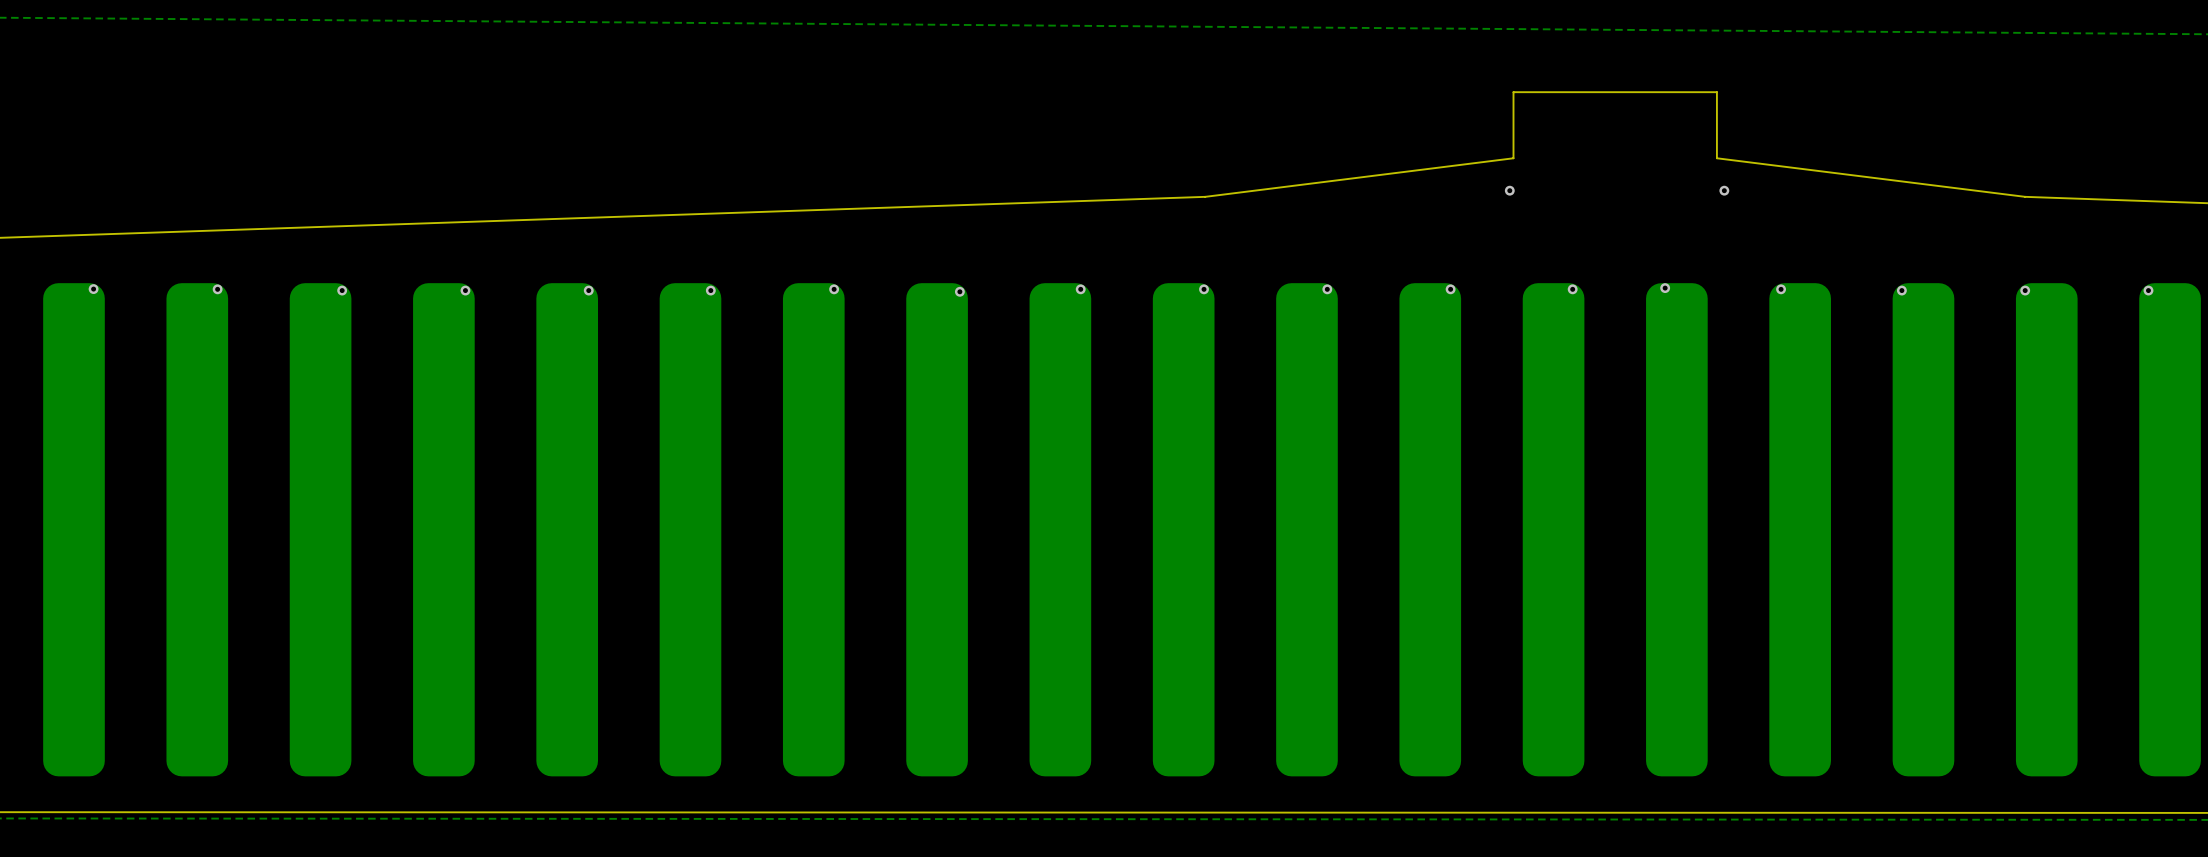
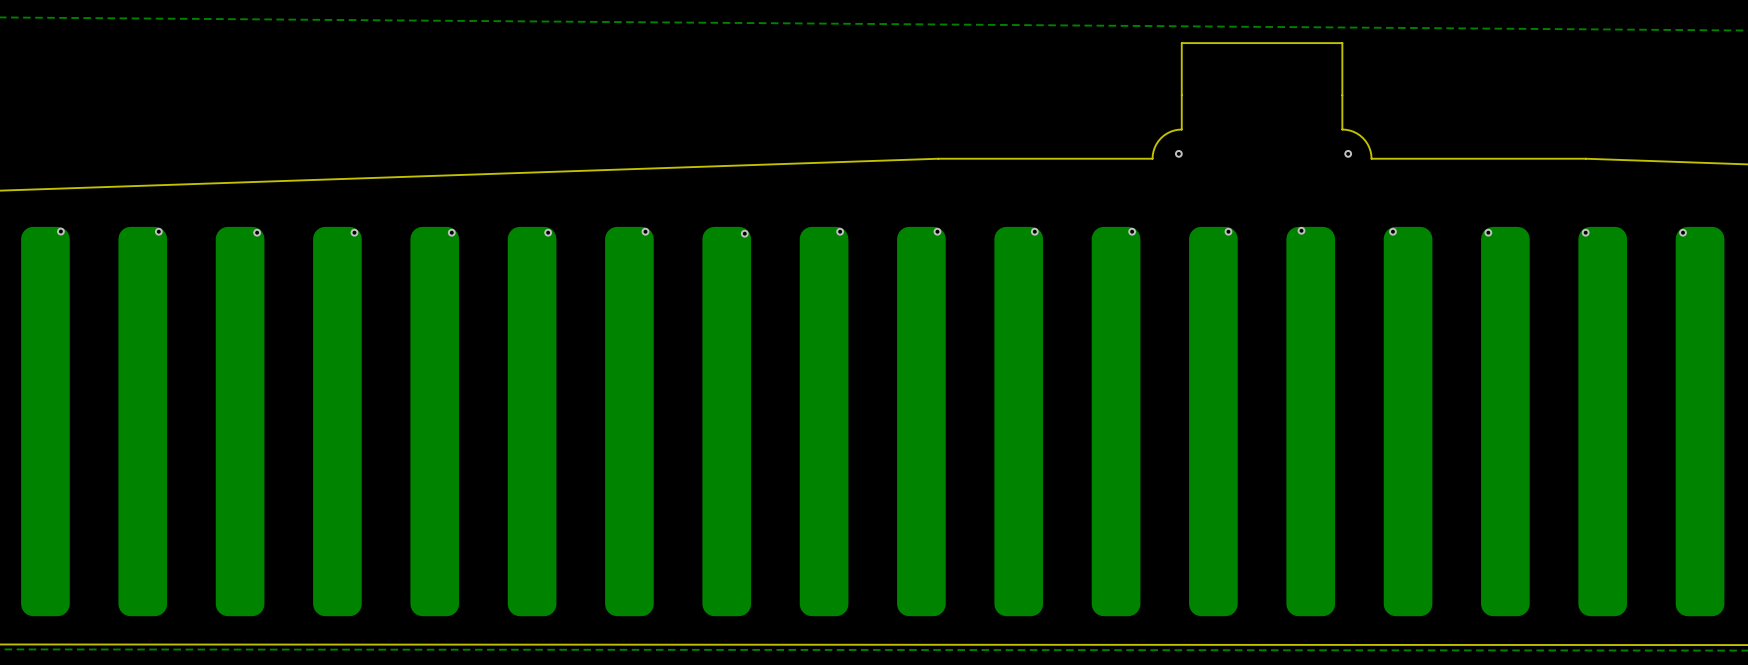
part position: (1615, 125) -> (1262, 69)
board edge: (1513, 158) (1205, 196) -> (1181, 95) (1181, 129) (1170, 131) (1161, 138) (1154, 147) (1152, 158) (938, 158)
board edge: (1716, 158) (2025, 196) -> (1342, 95) (1342, 129) (1353, 131) (1363, 138) (1369, 147) (1371, 158) (1585, 158)

